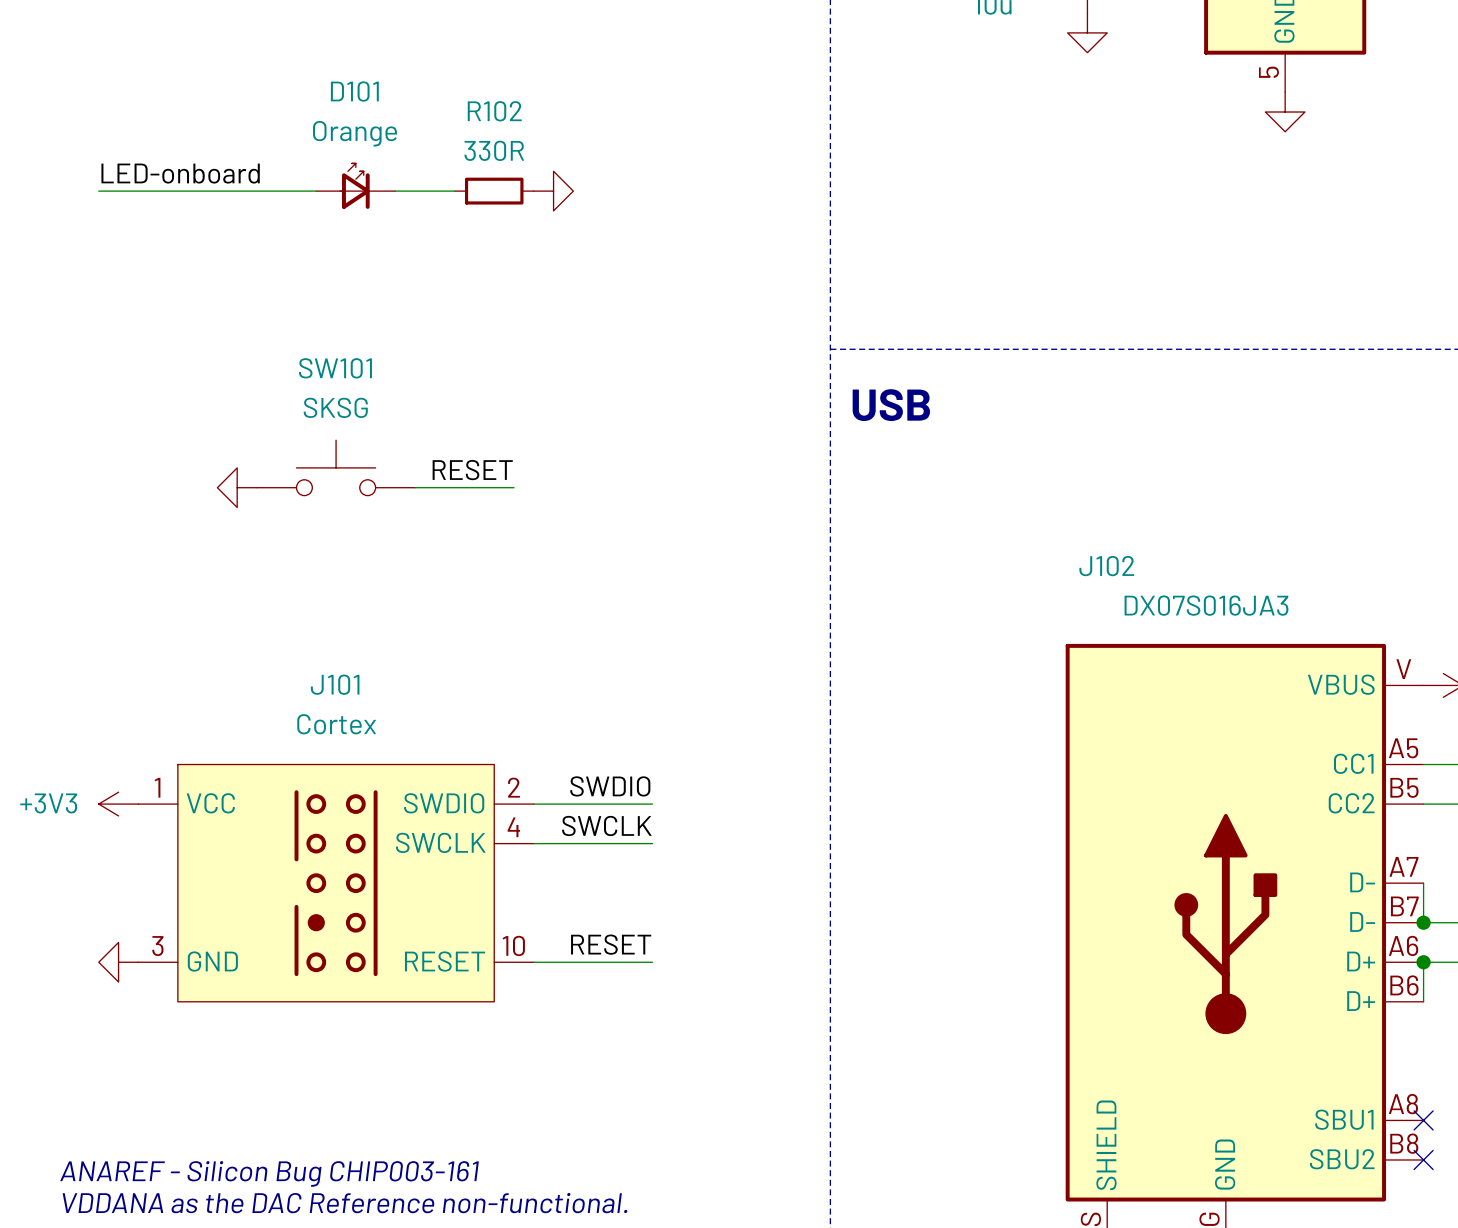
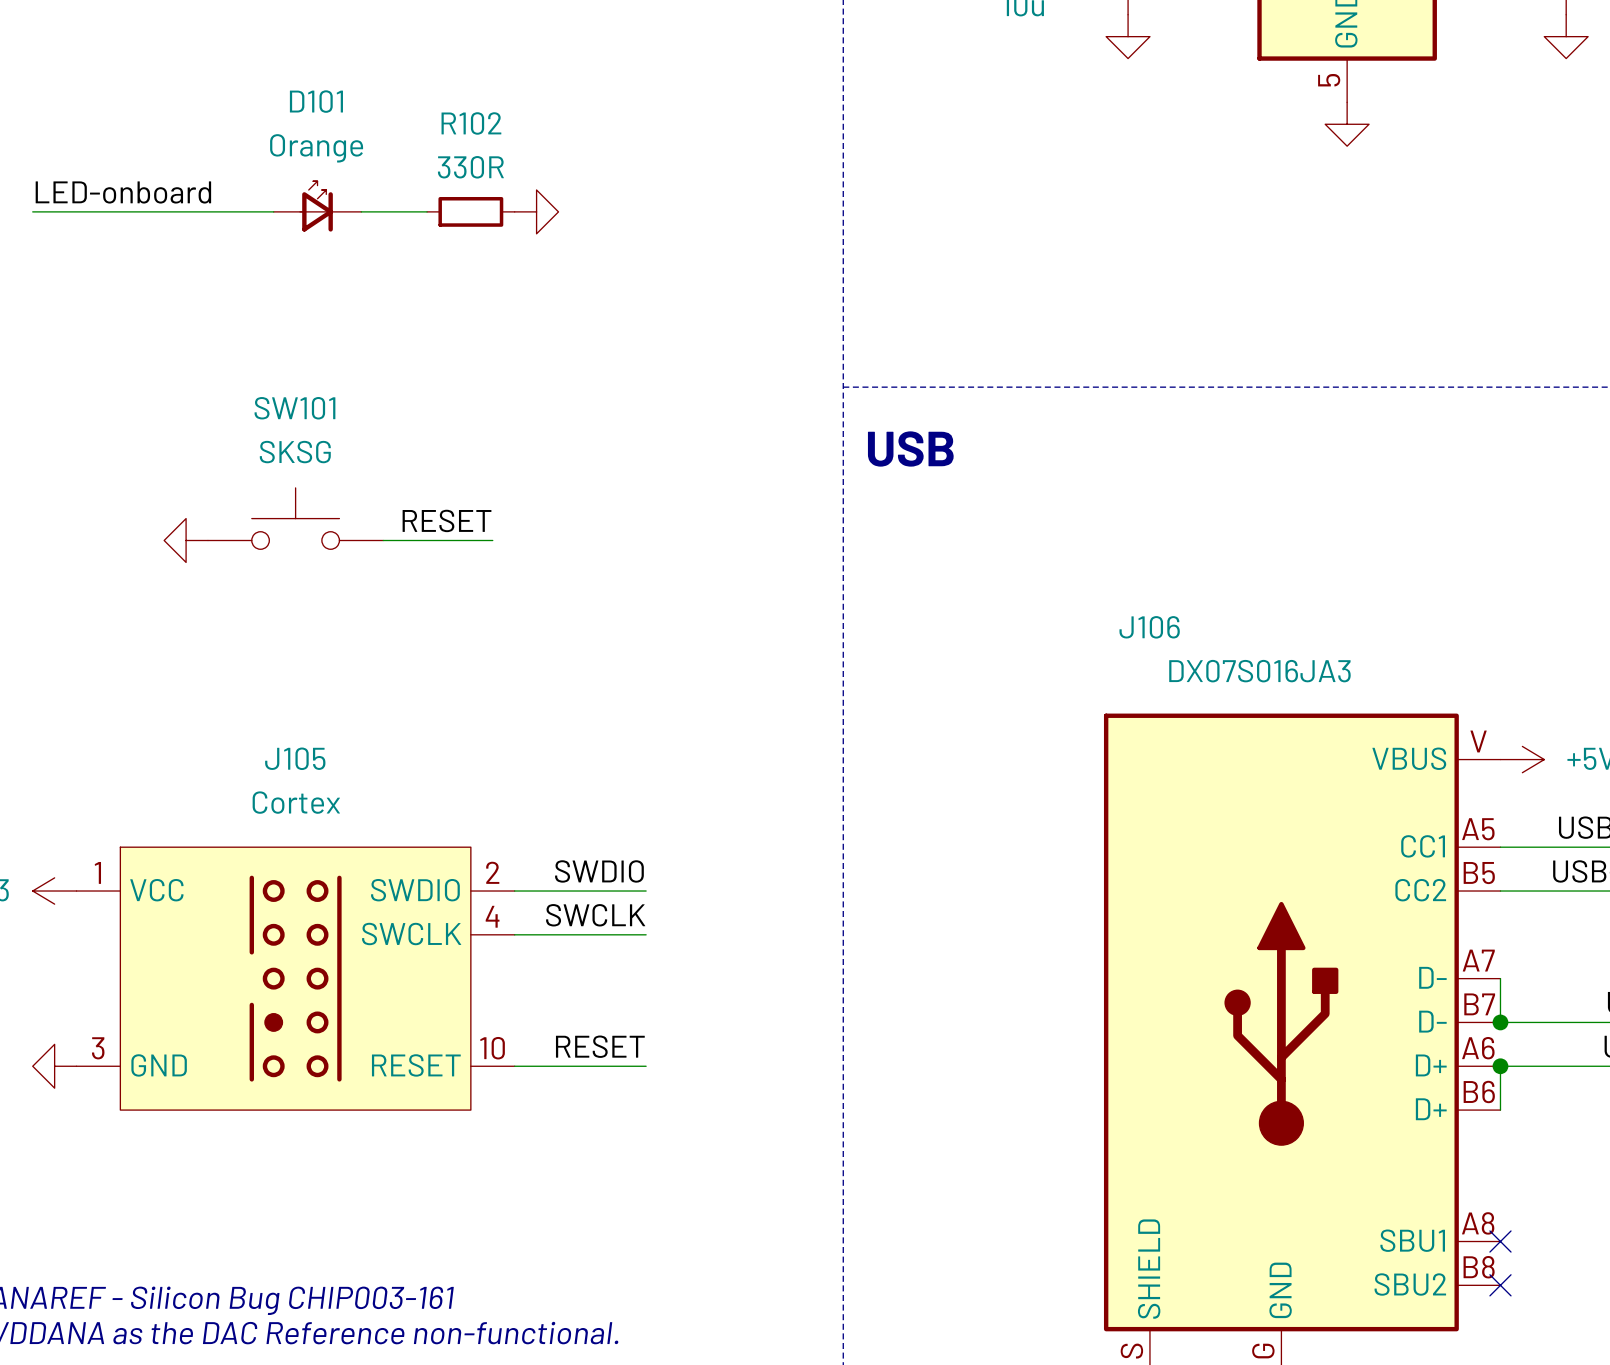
J102 name: J102 (1106, 566) -> J106 (1149, 627)
J101 name: J101 (335, 684) -> J105 (295, 758)

